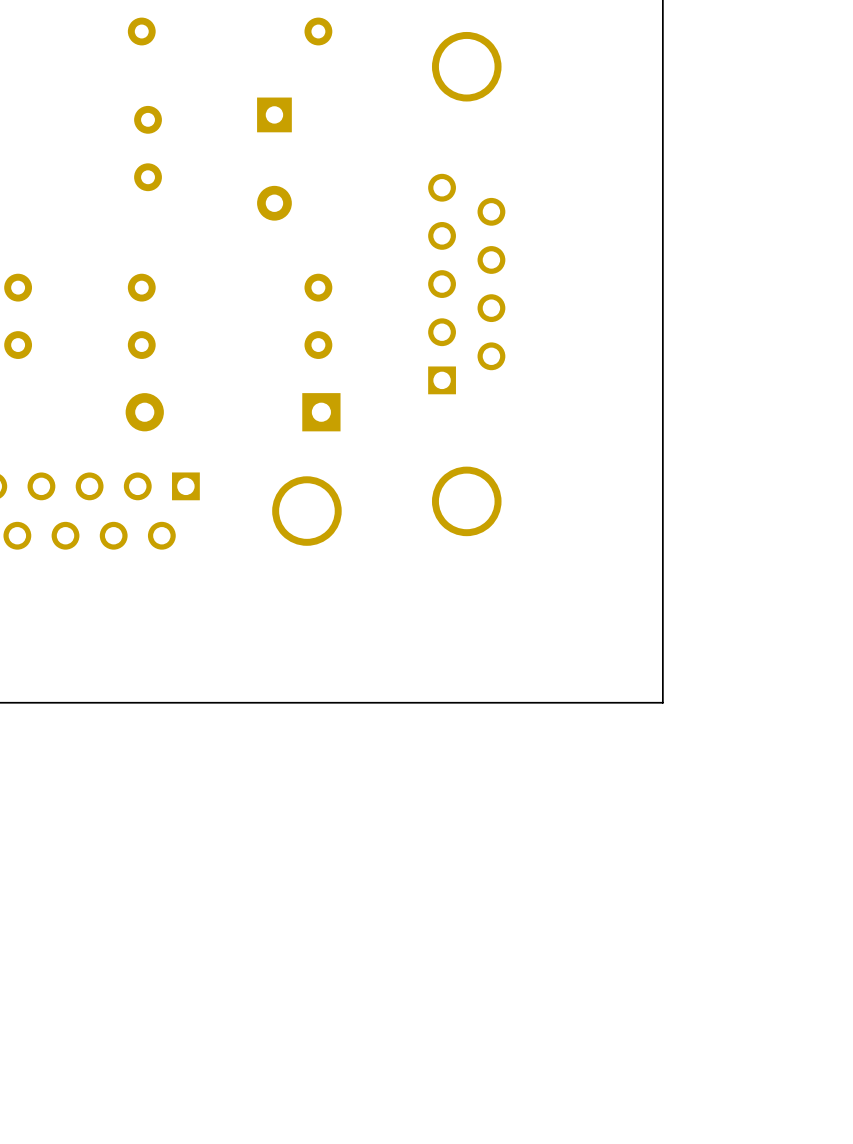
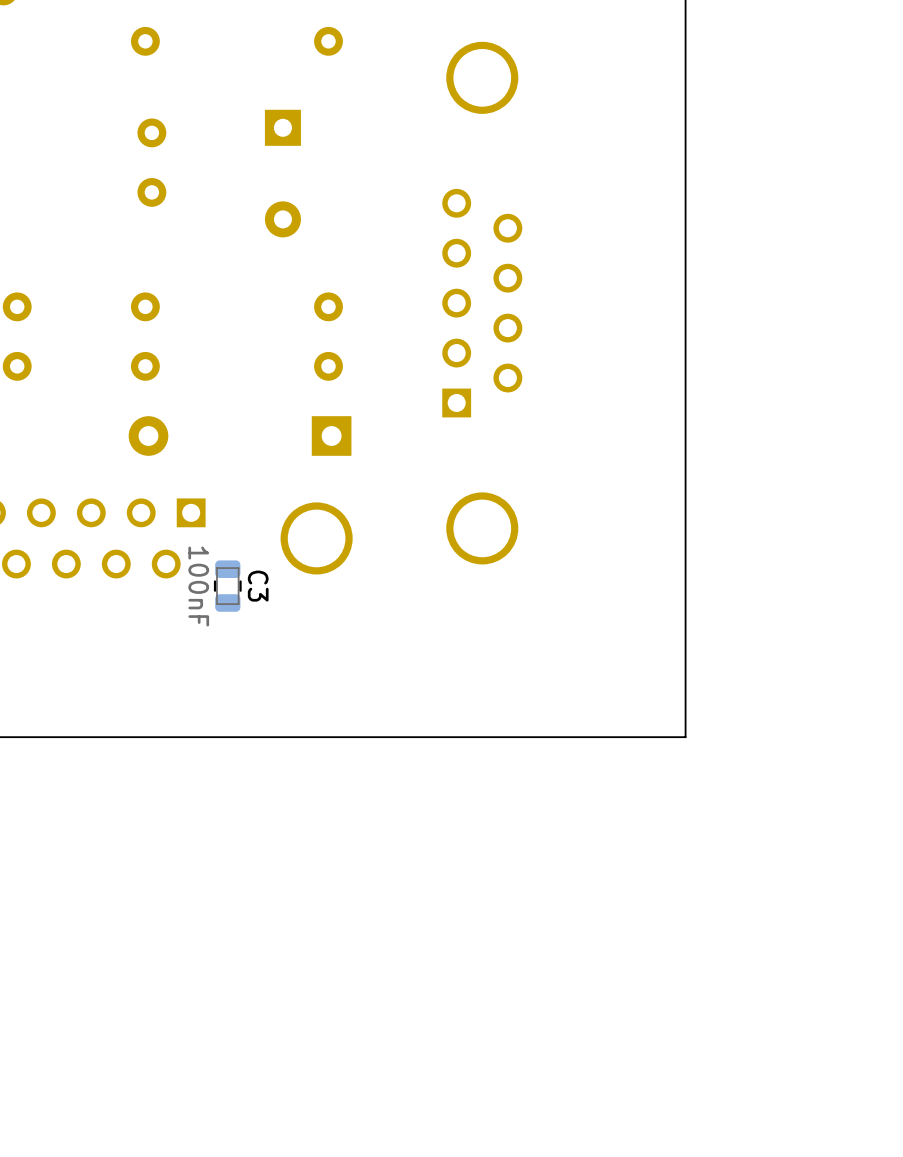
C3: none -> 100nF (227, 586)

